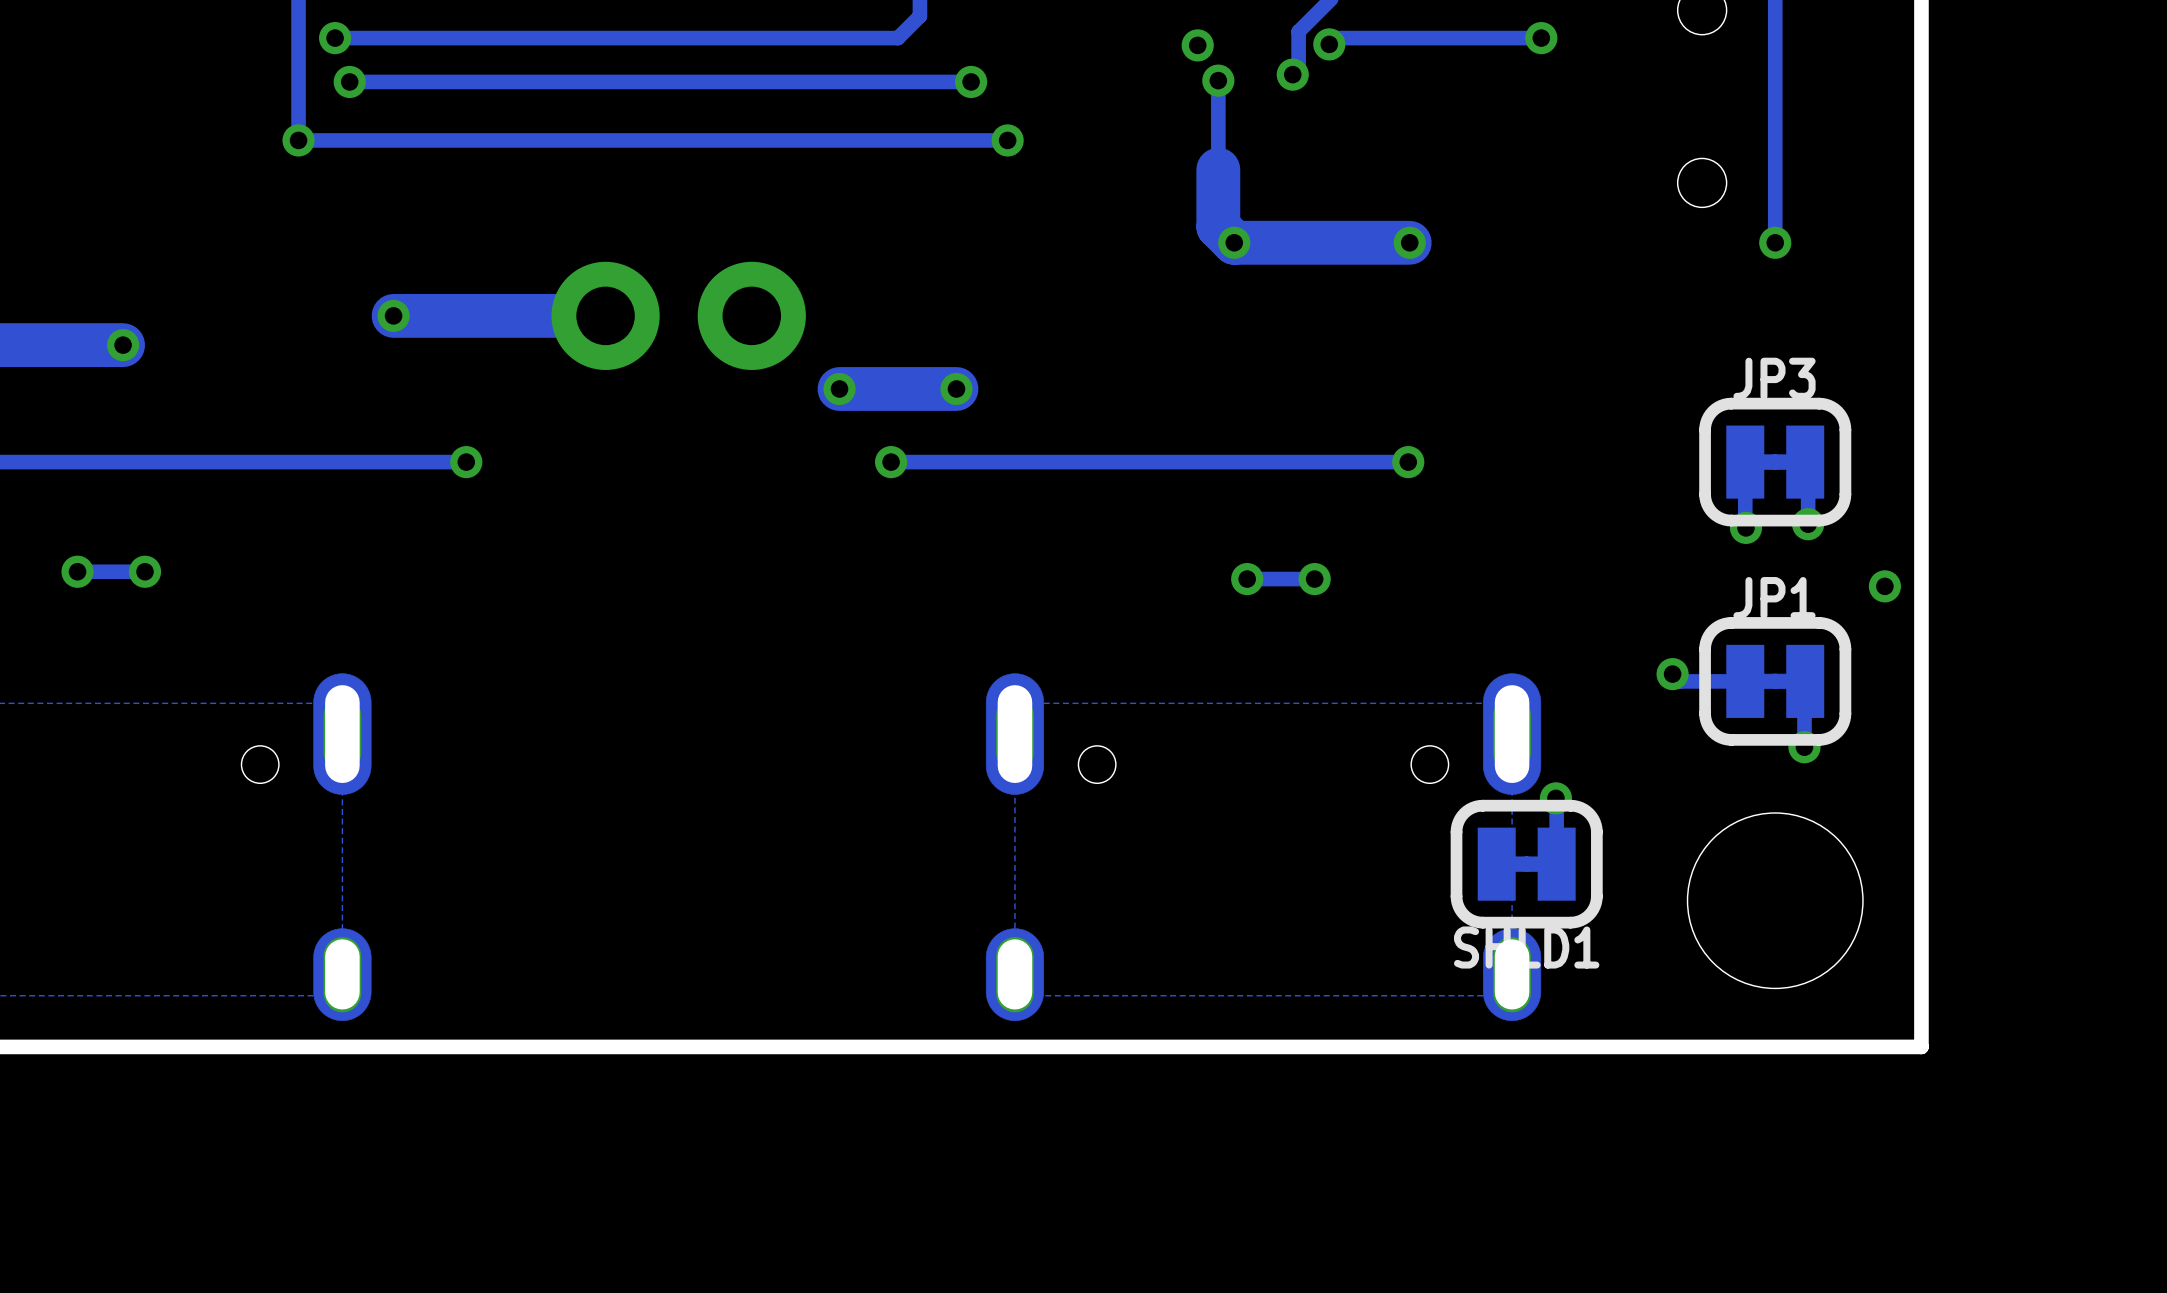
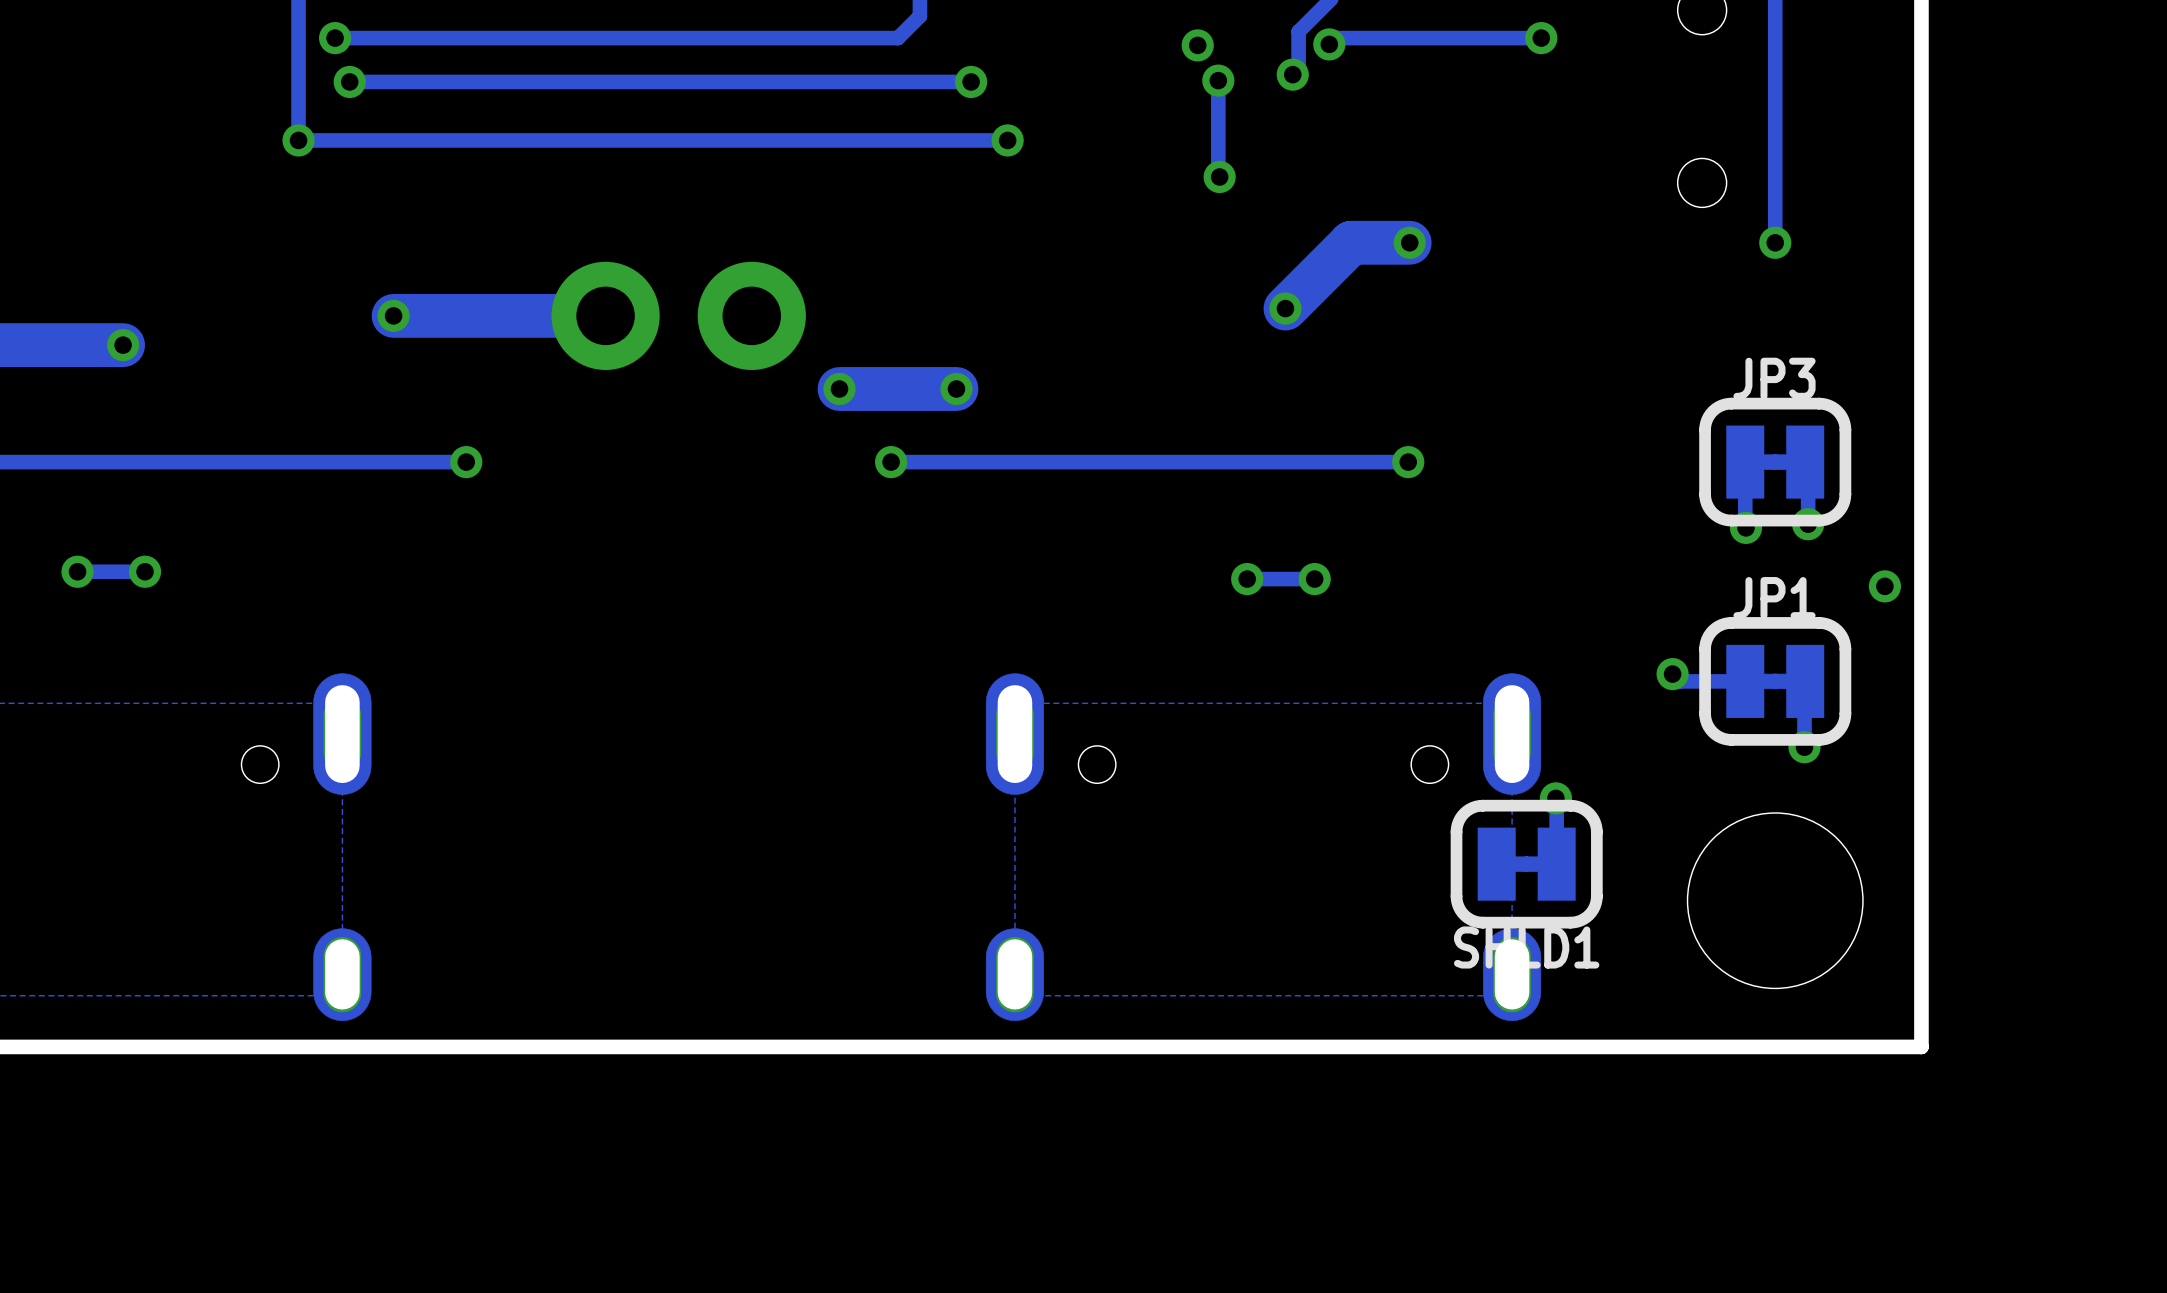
track: (1218, 169) (1218, 226) (1234, 242) (1351, 242) -> (1285, 308) (1351, 242)
via: none -> (1219, 176)
via: (1234, 242) -> none
via: none -> (1285, 308)

